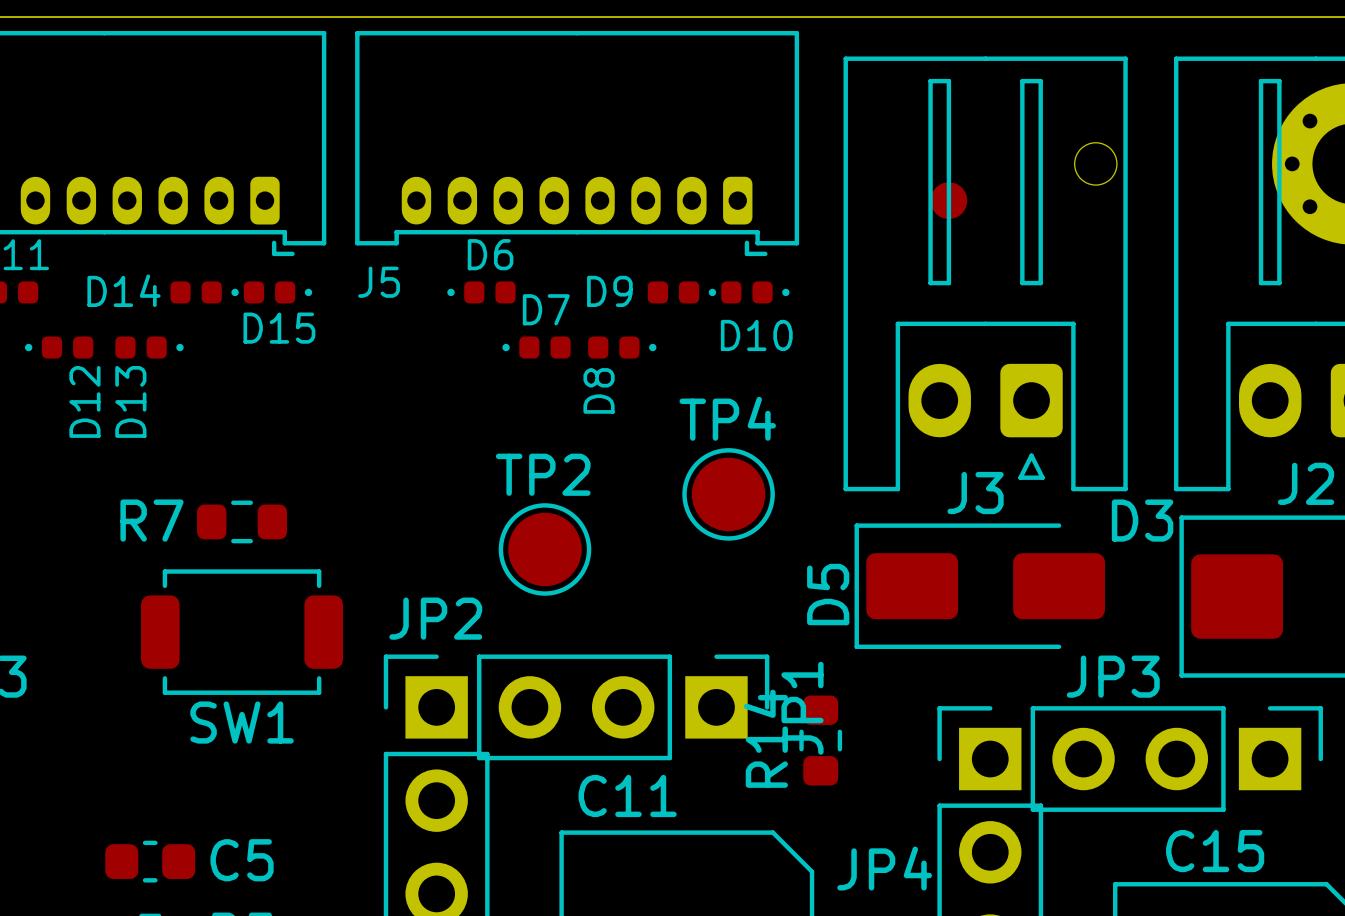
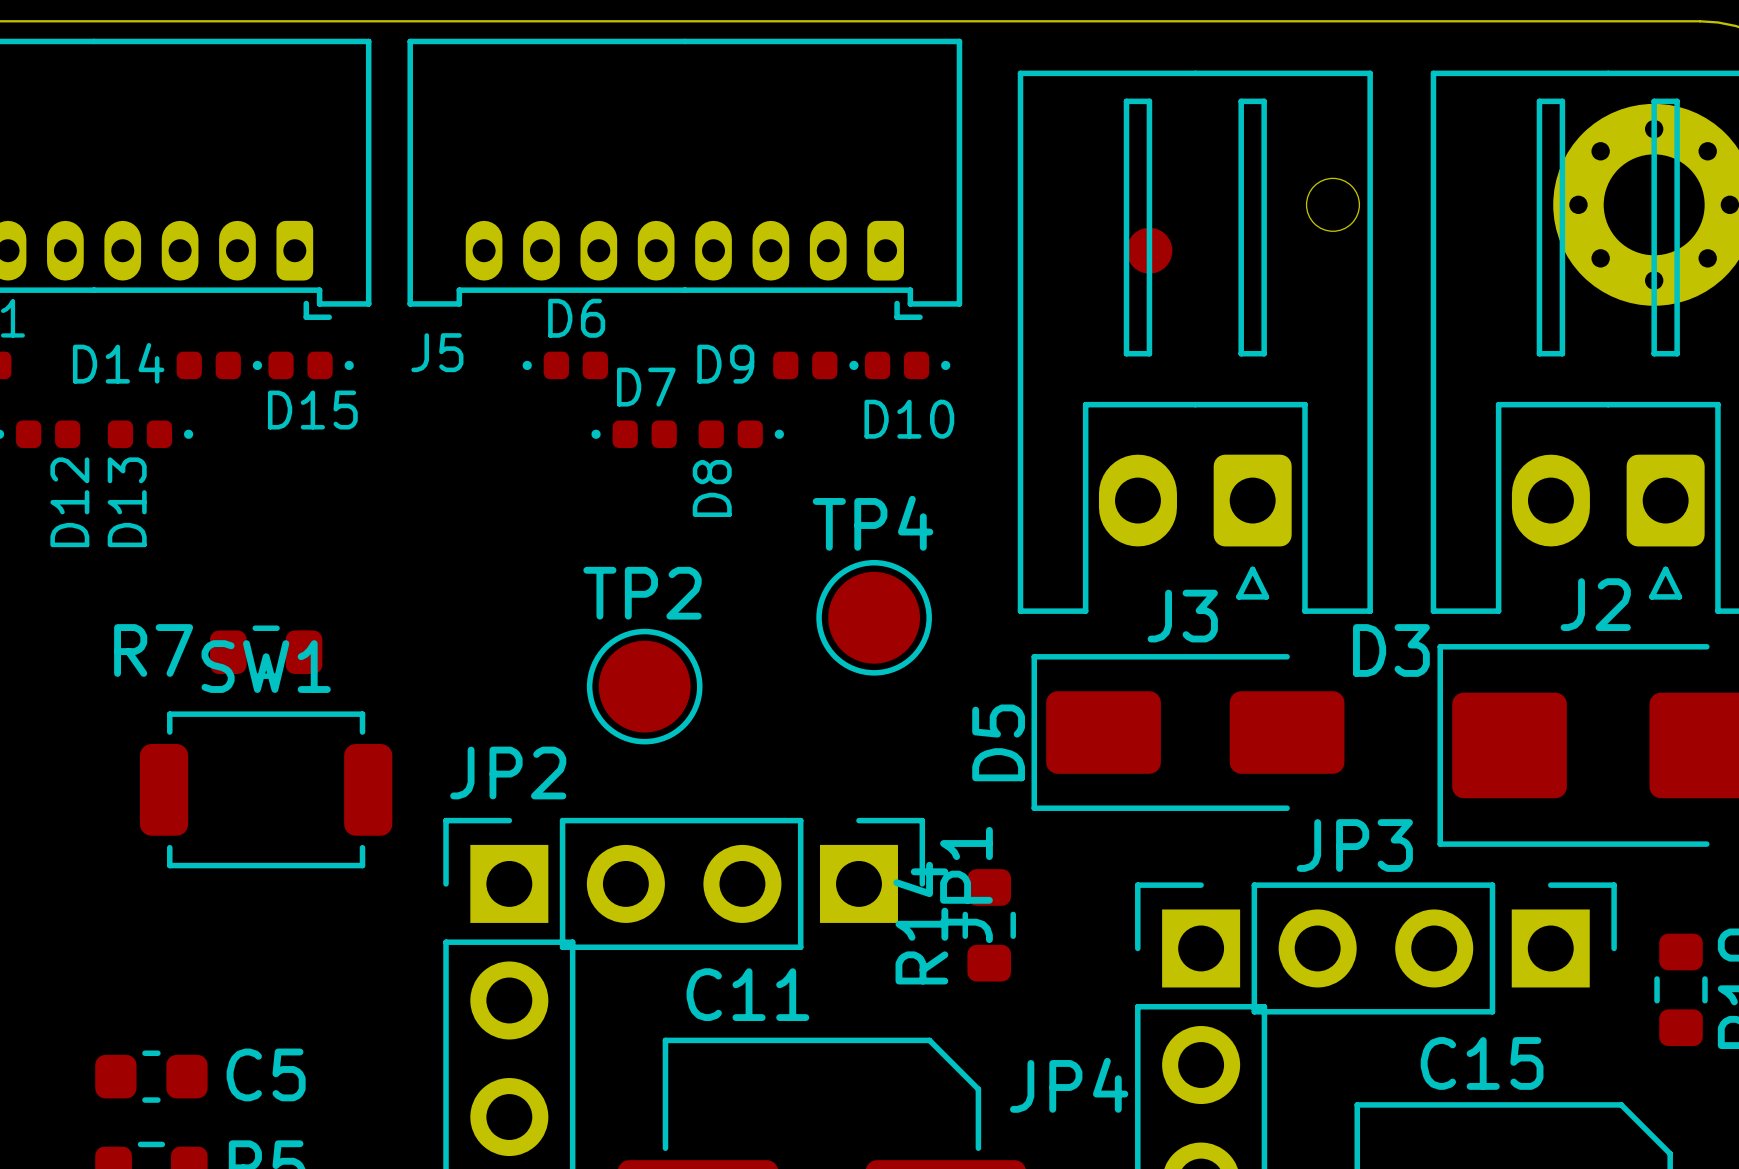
SW1 name position: SW1 (242, 722) -> SW1 (266, 666)

